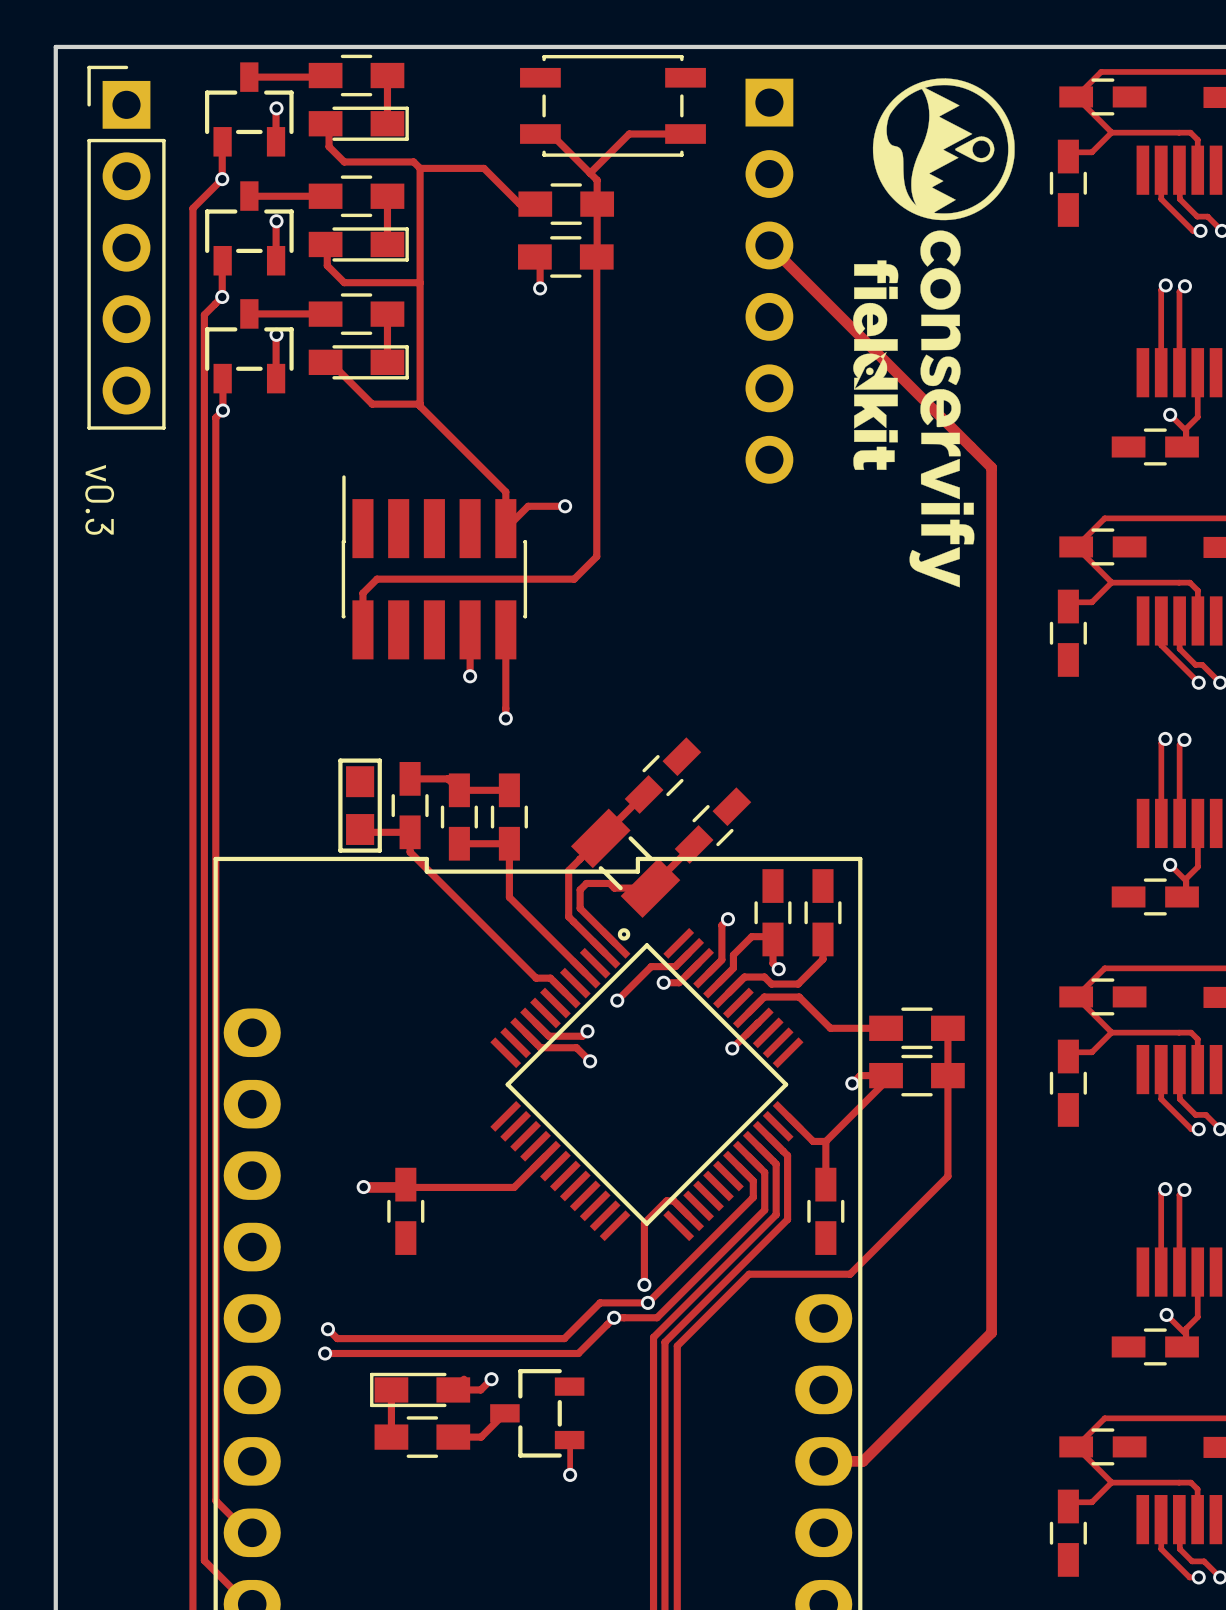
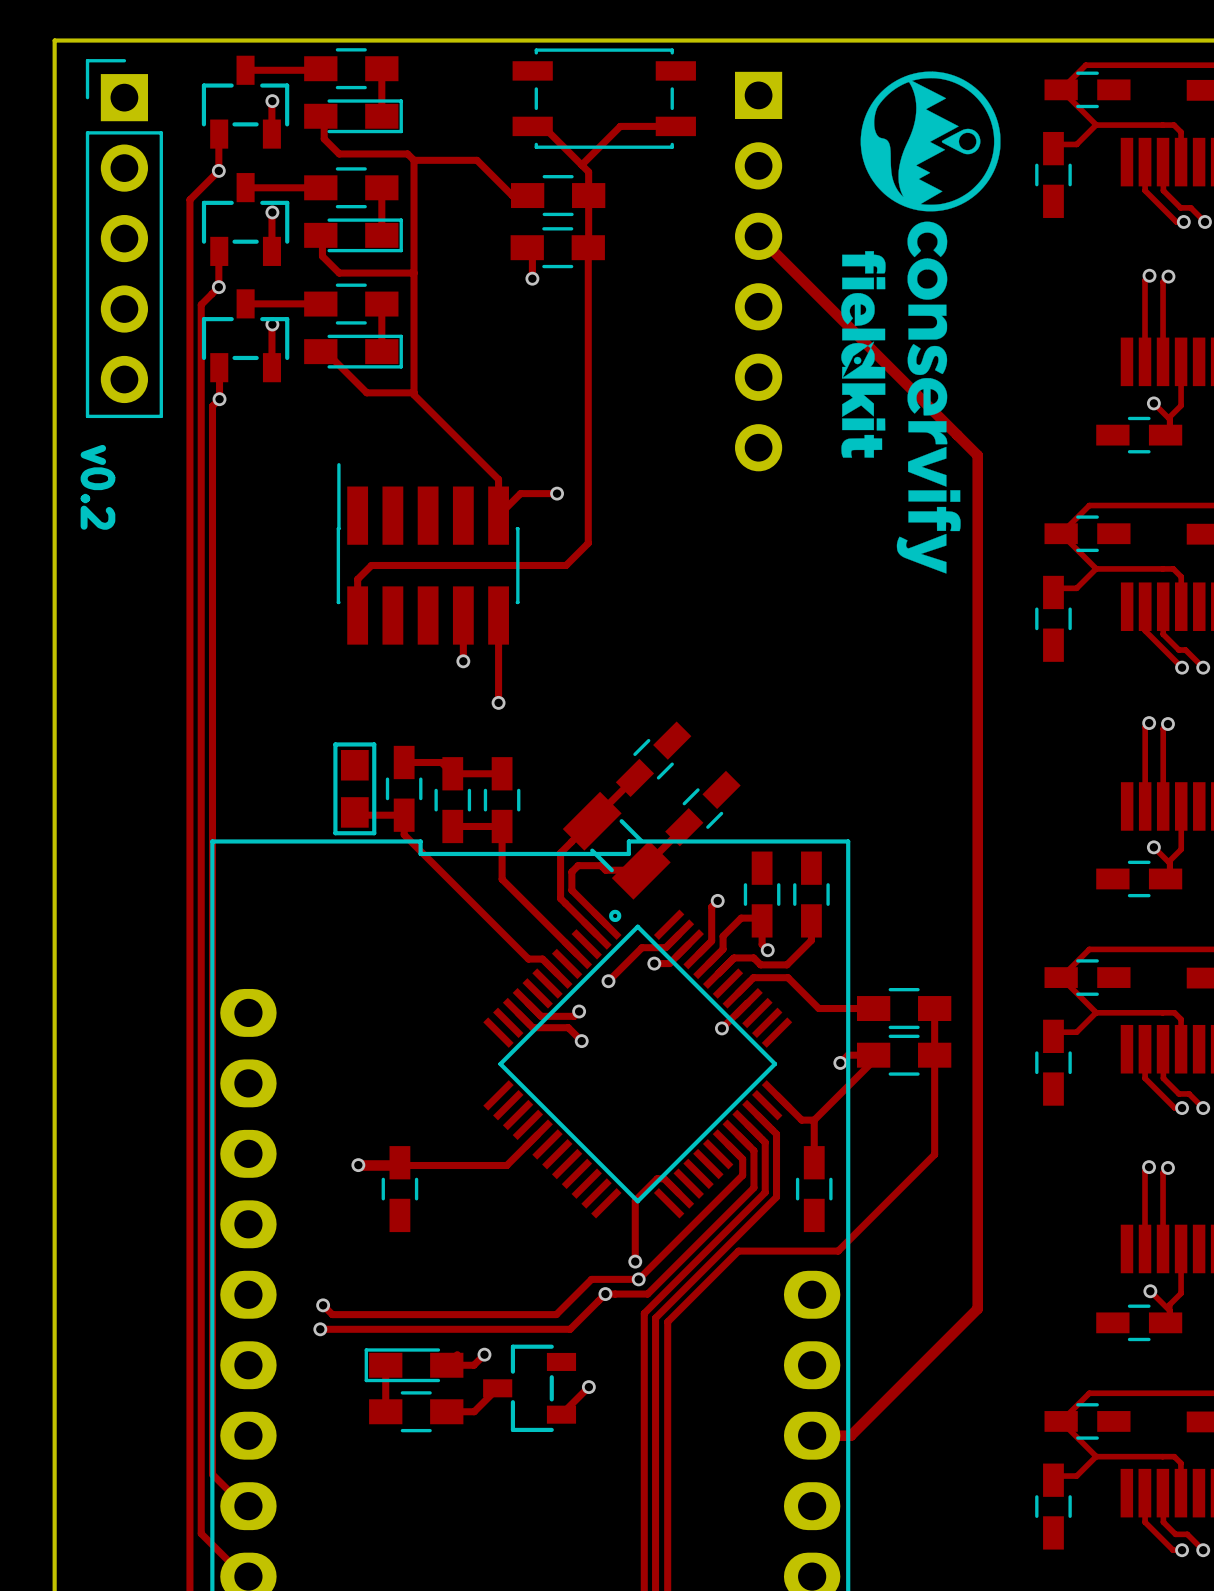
text: v0.3 (99, 499) -> v0.2 (97, 487)
track: (569, 1440) (570, 1474) -> (561, 1414) (588, 1387)
via position: (570, 1474) -> (588, 1387)

